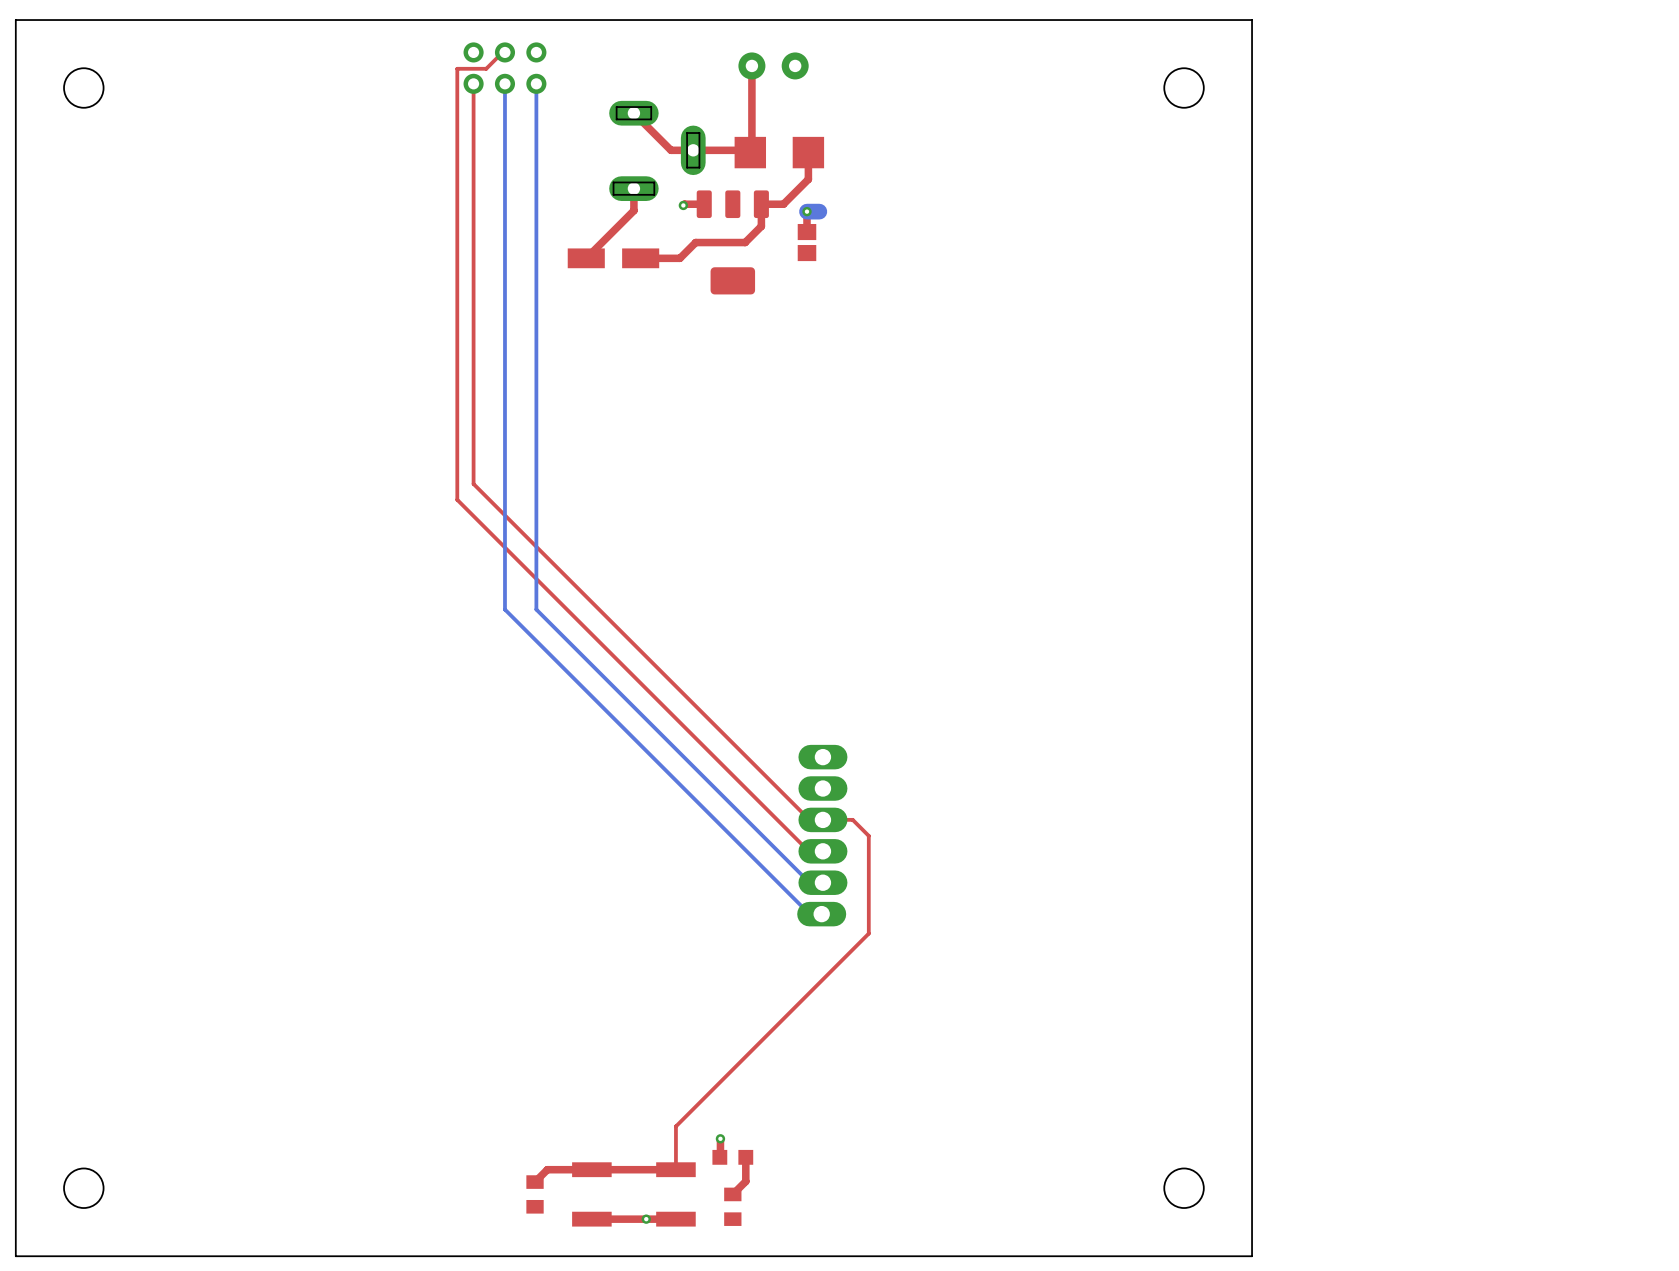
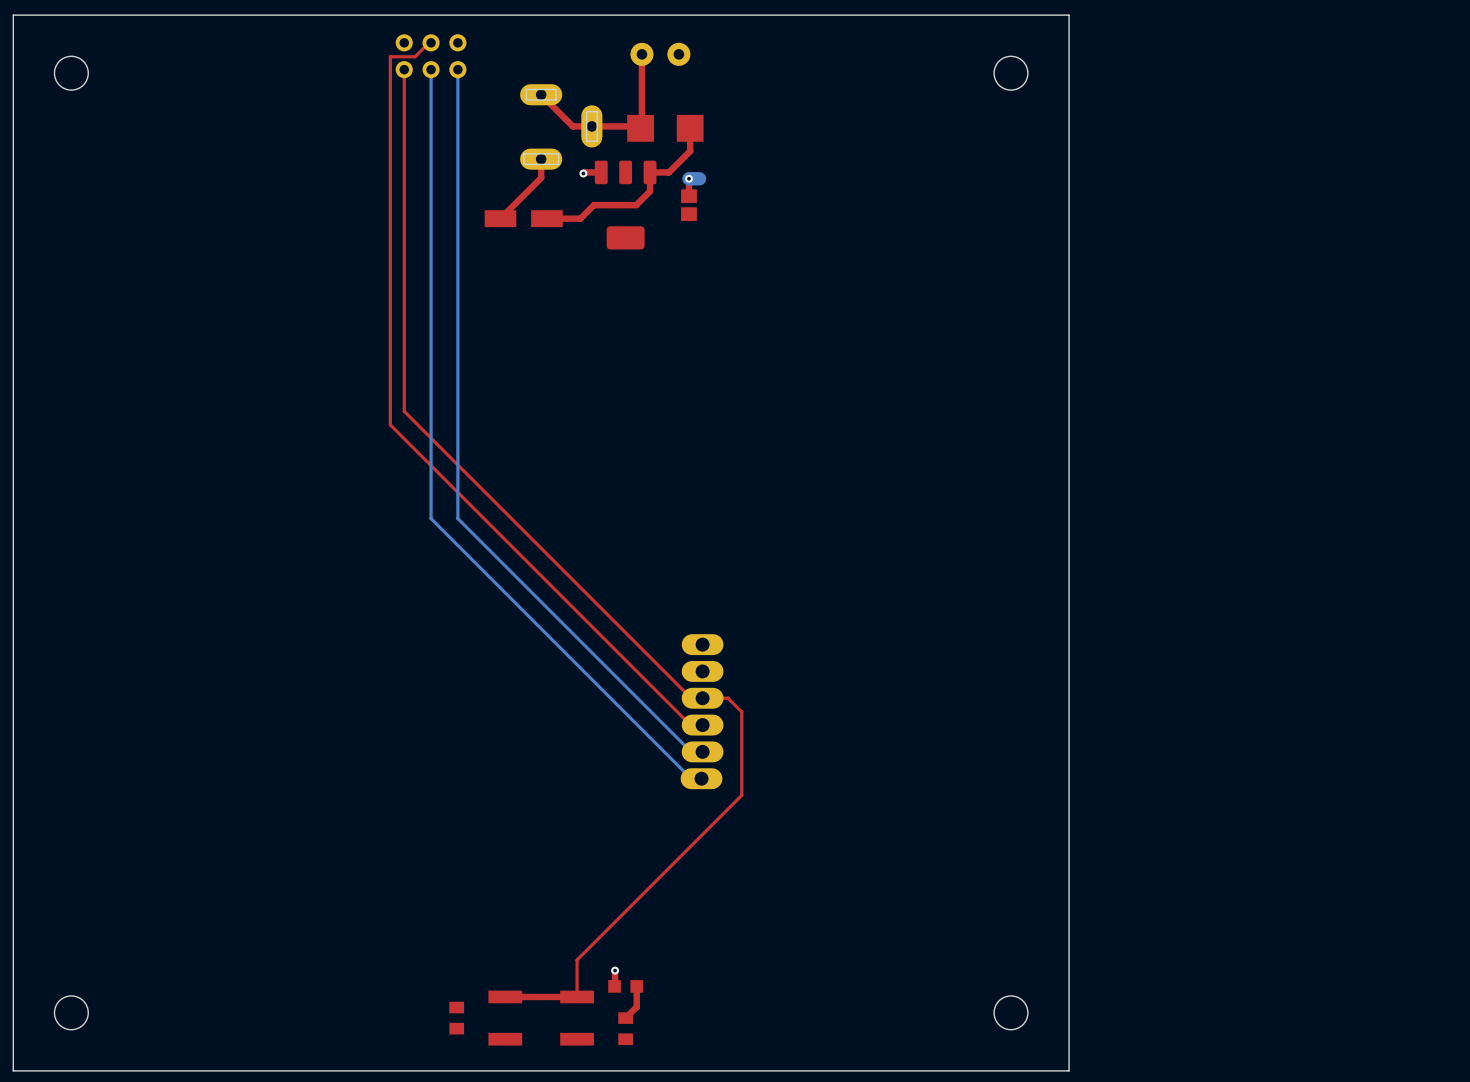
top track: (591, 1169) (547, 1169) (535, 1182) -> none
via: (646, 1219) -> none
top track: (675, 1219) (591, 1219) -> none

